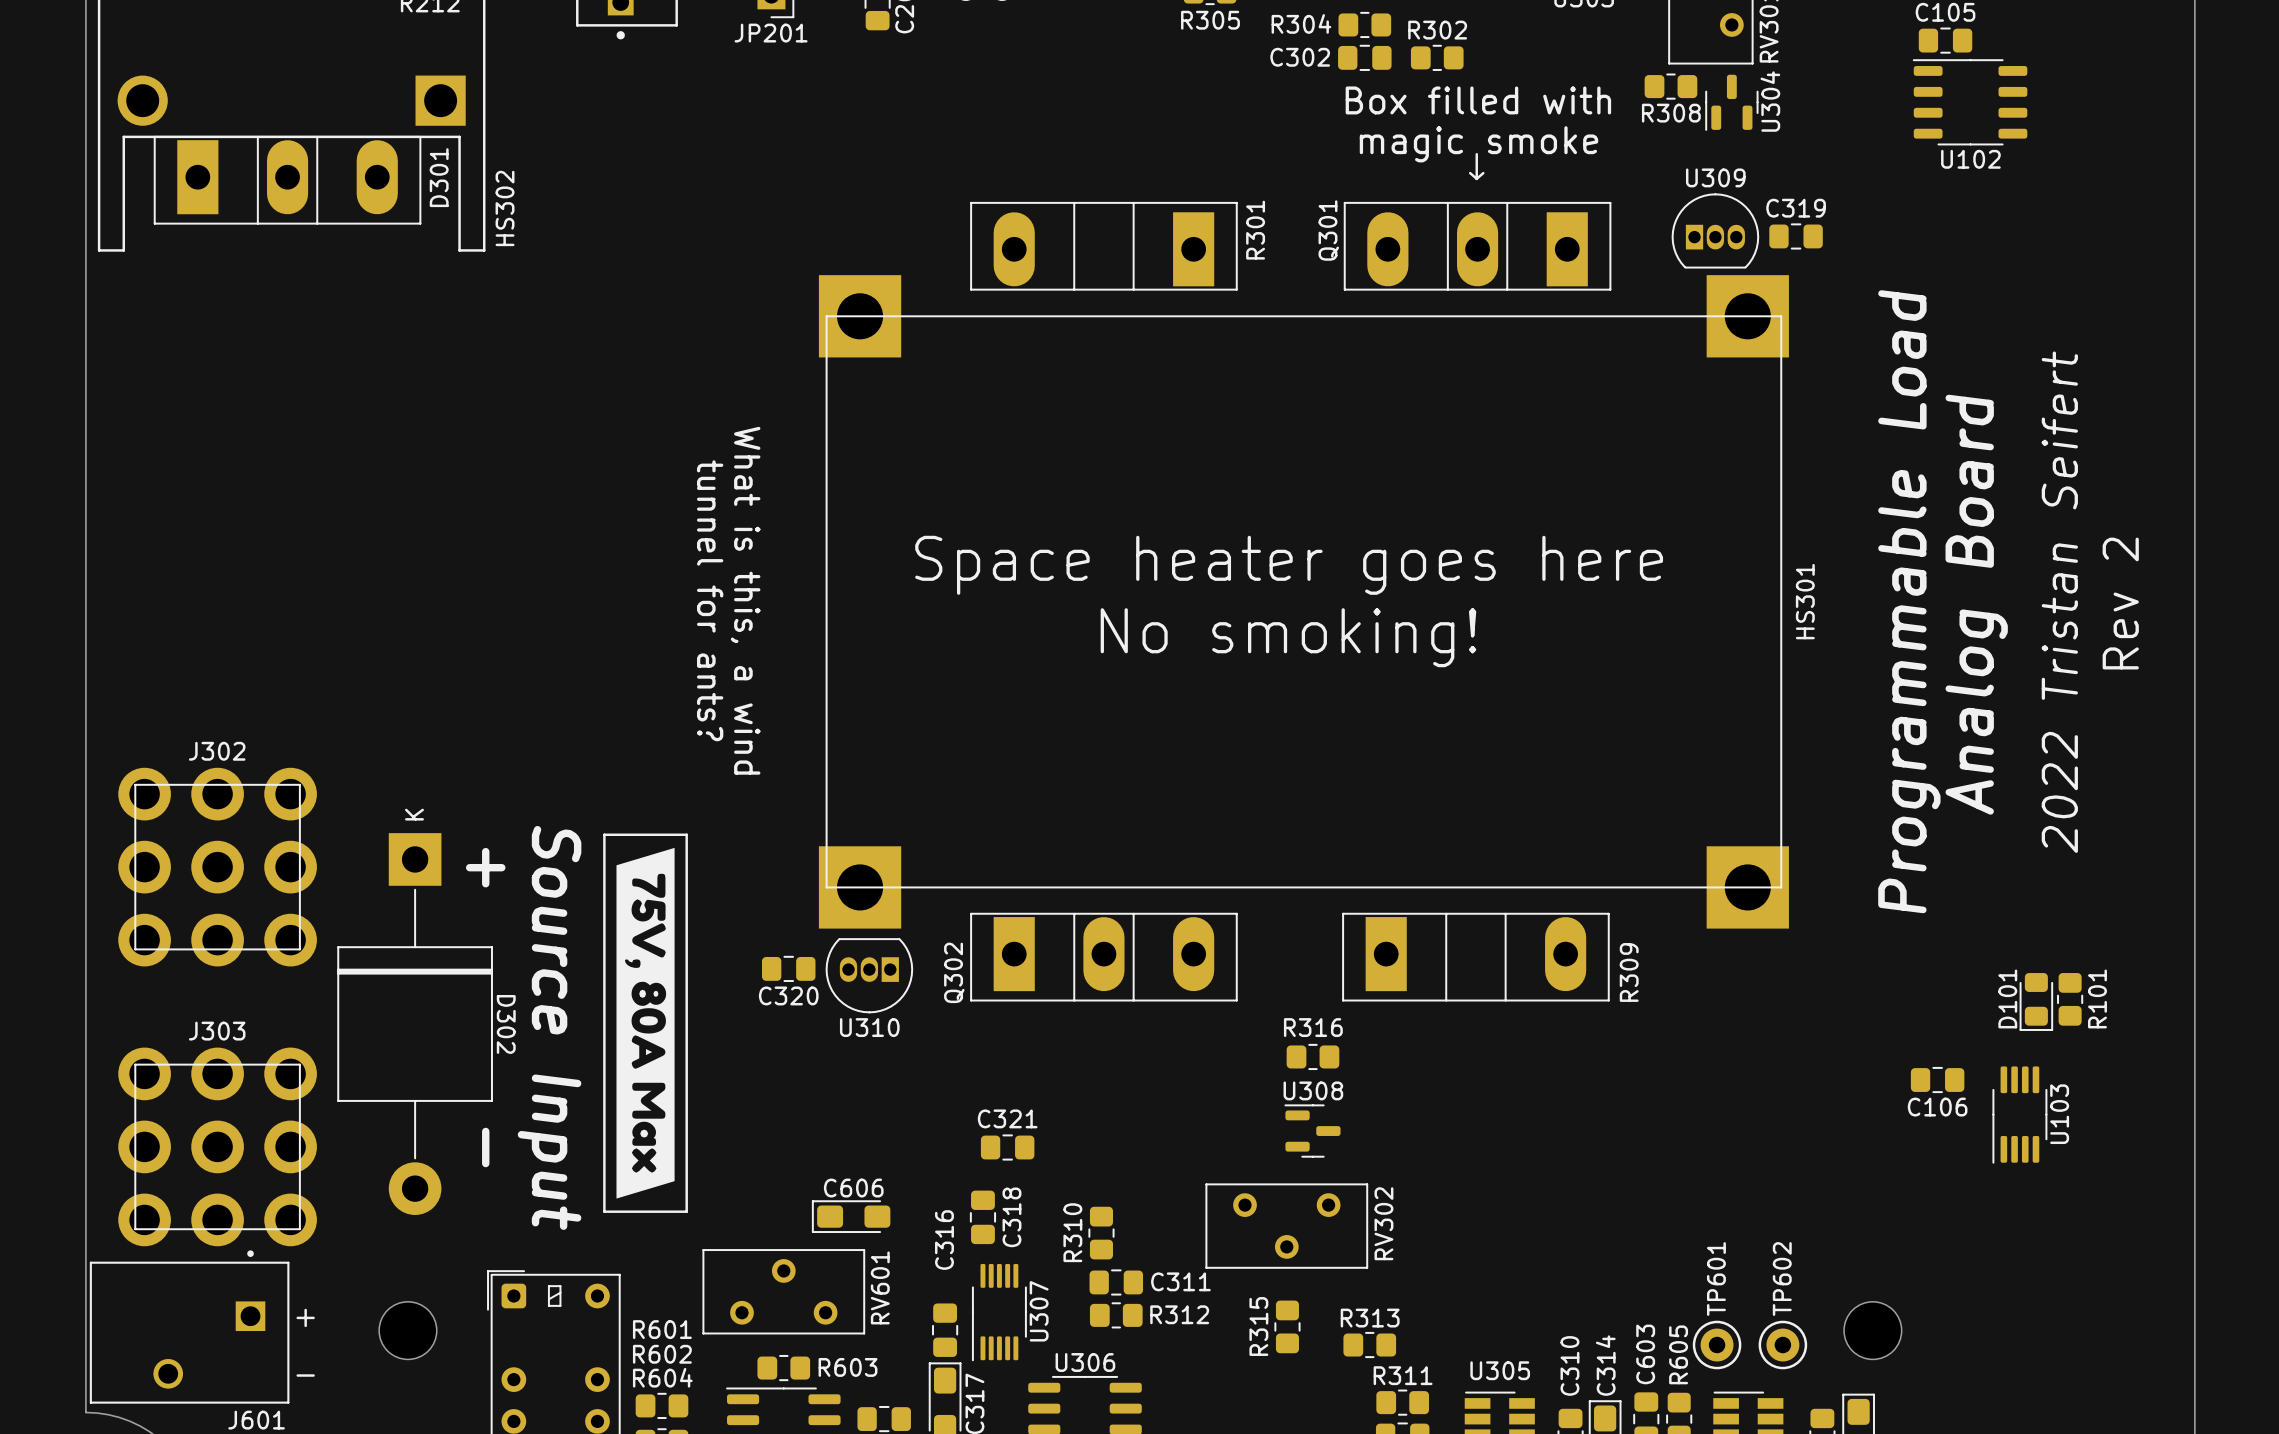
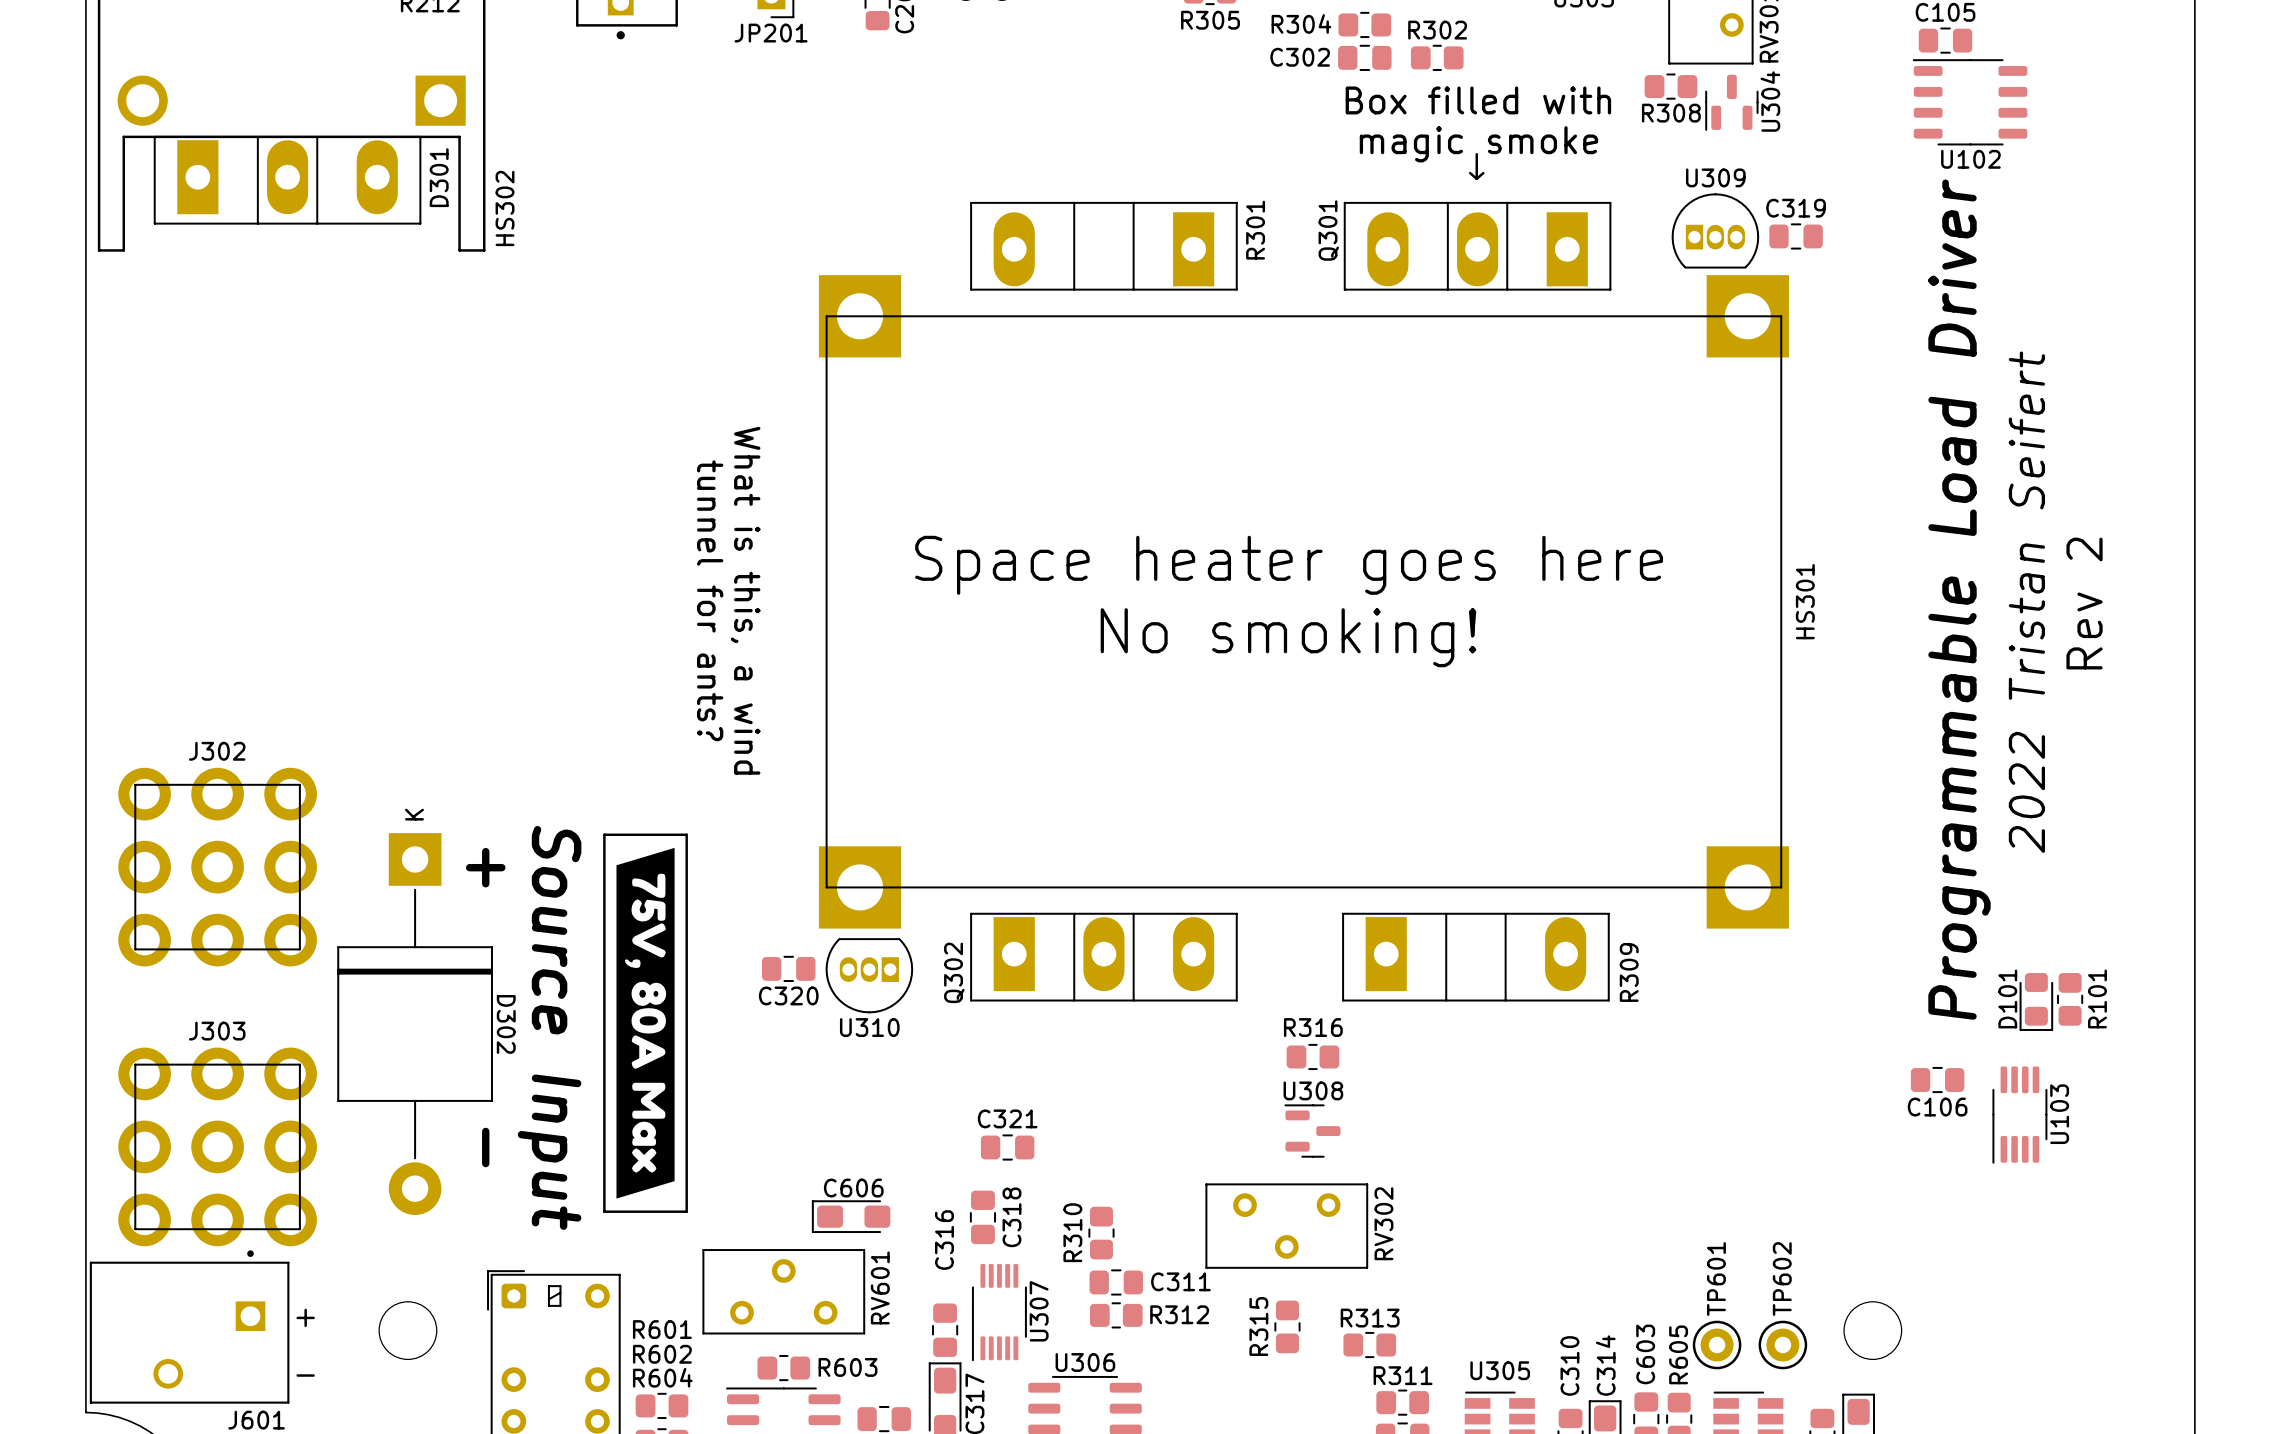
text: Programmable Load (1909, 601) -> Programmable Load Driver (1959, 599)
text position: 2022 Tristan Seifert (2059, 602) -> 2022 Tristan Seifert (2026, 602)
text position: Rev 2 (2120, 603) -> Rev 2 (2084, 603)
text: Analog Board (1976, 604) -> none

